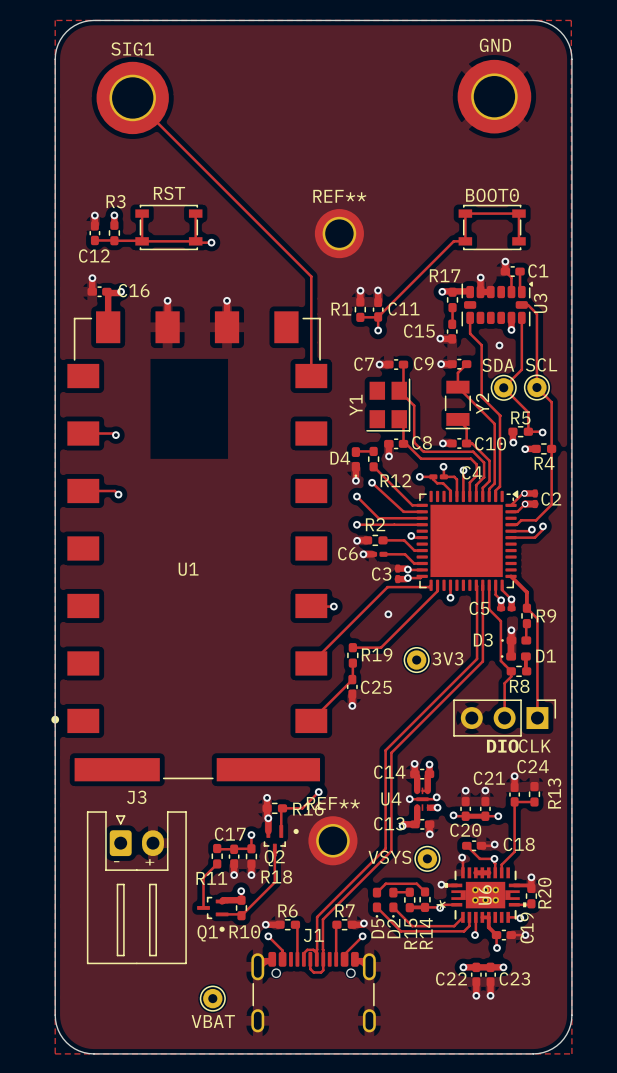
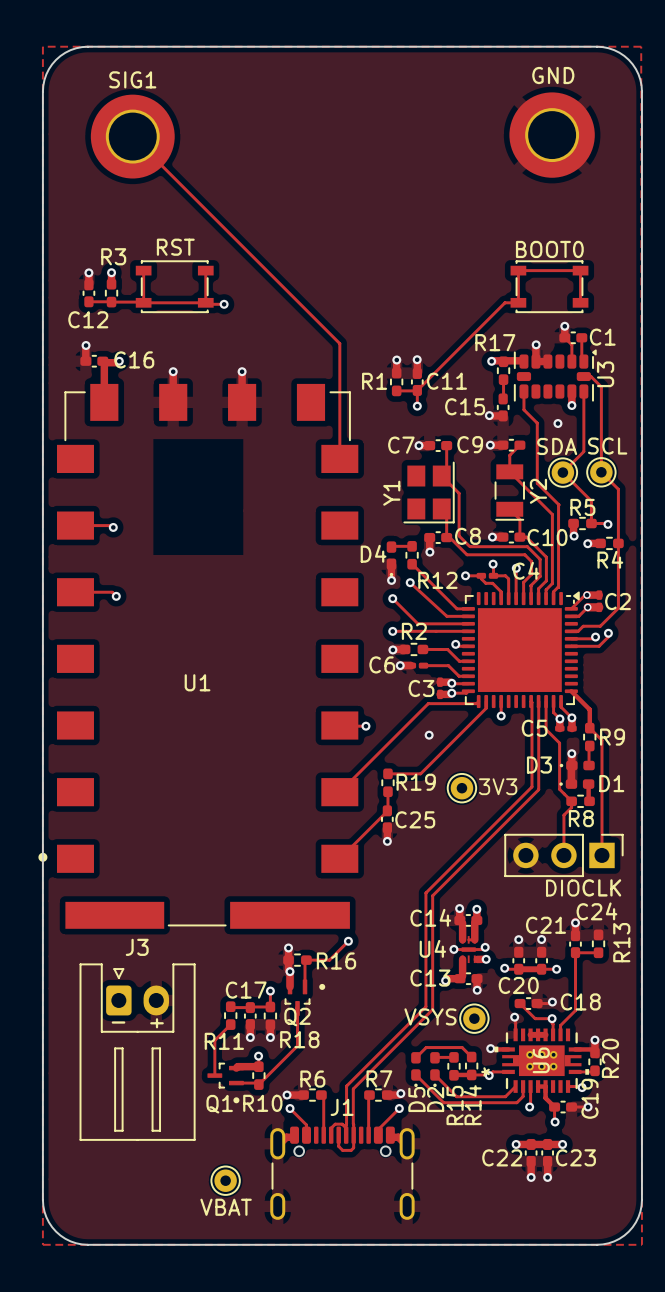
REF**: (339, 233) -> none
REF**: (332, 840) -> none

